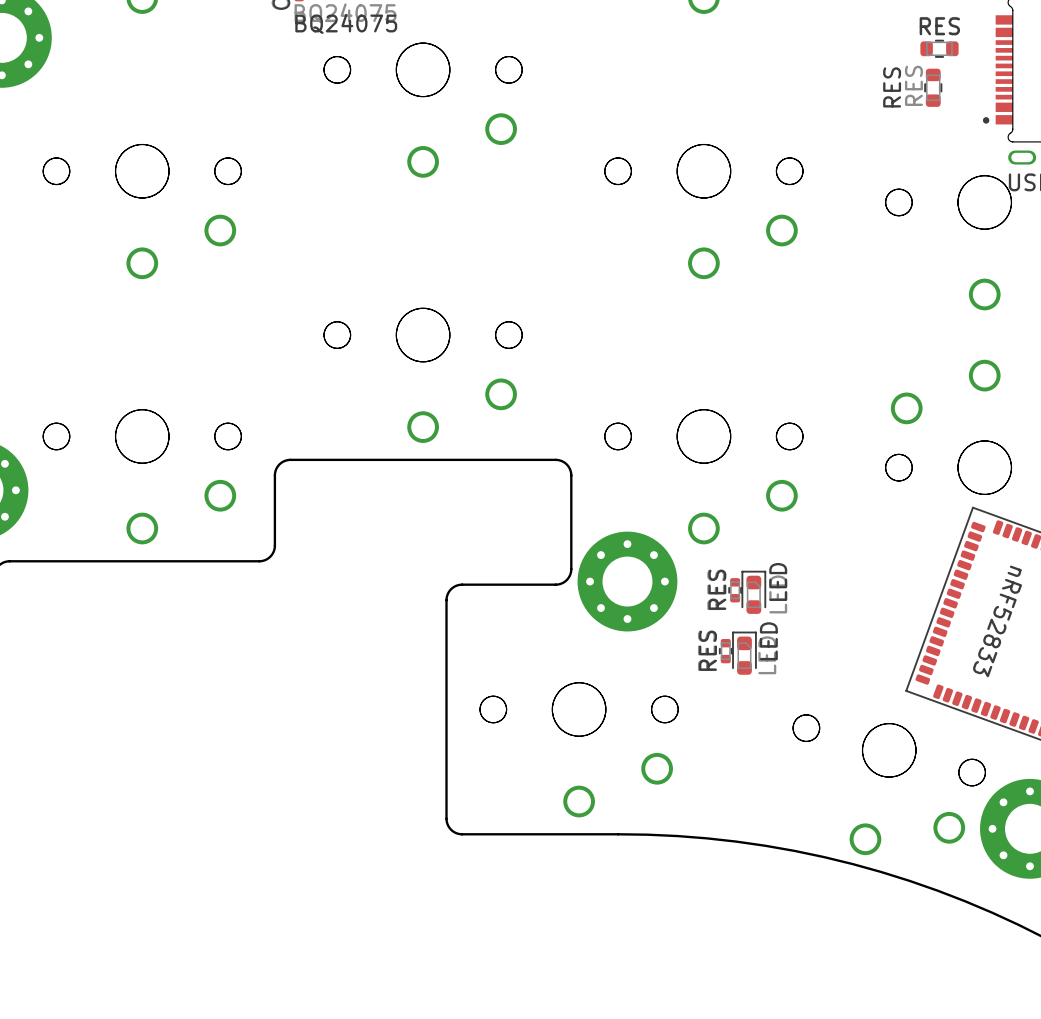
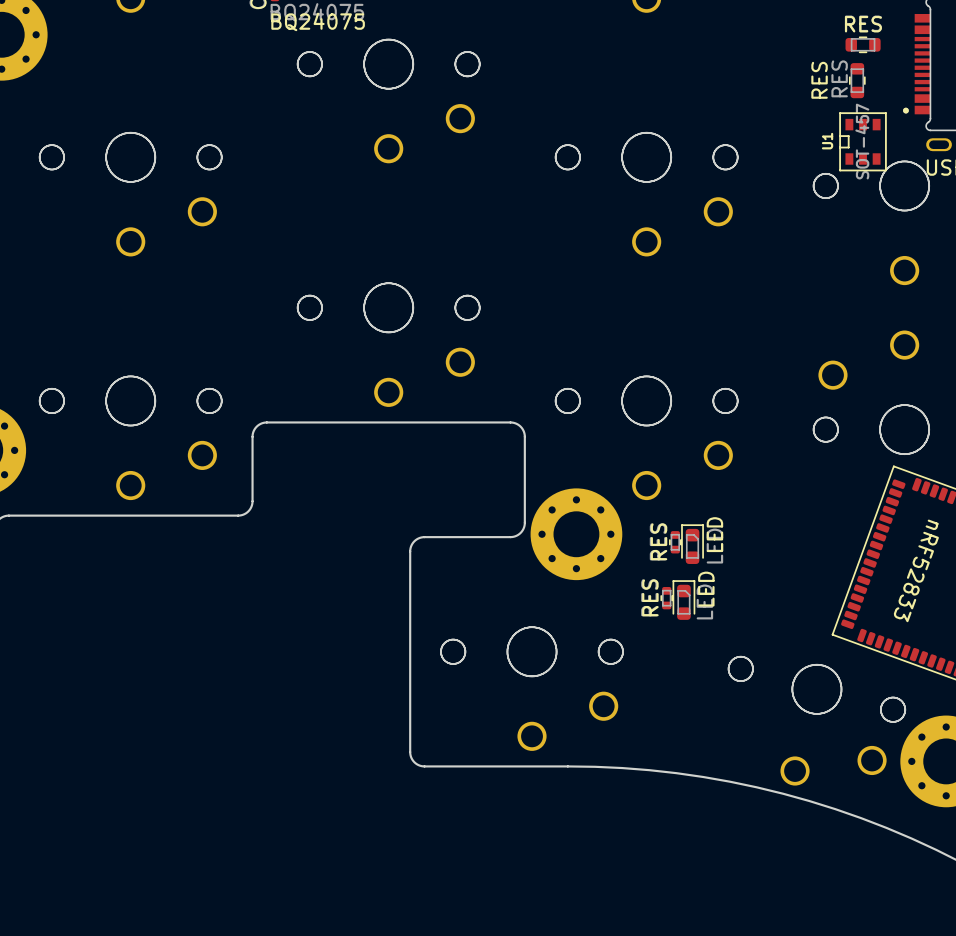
U1: none -> SOT-457 (863, 141)

